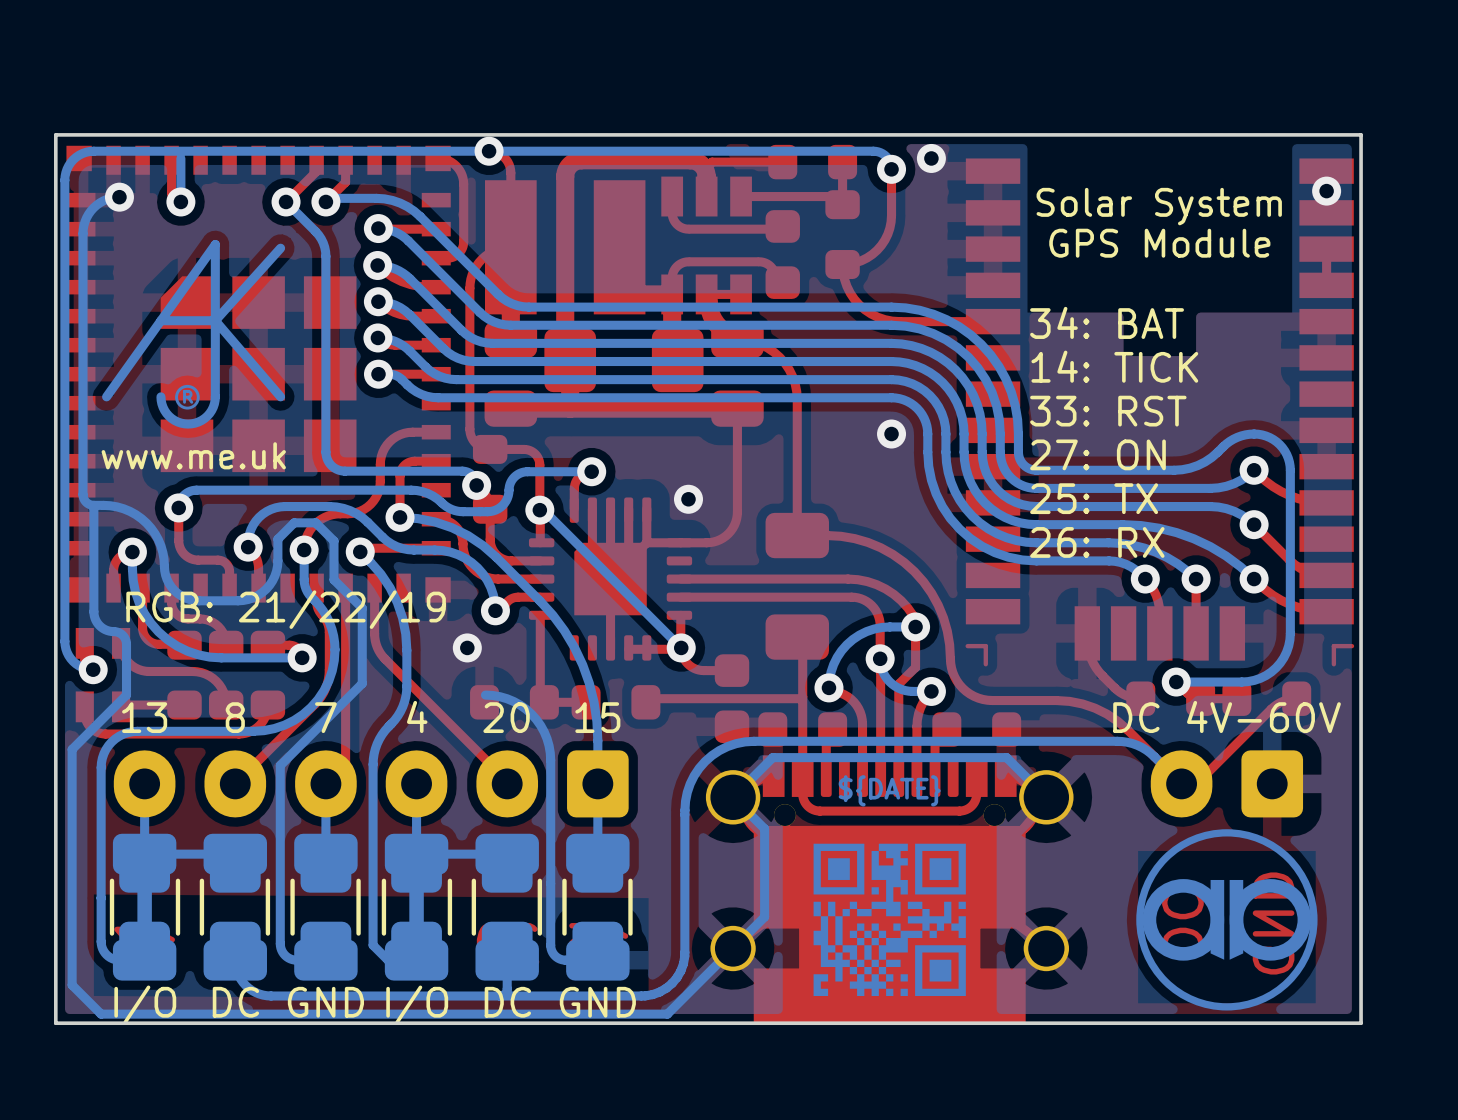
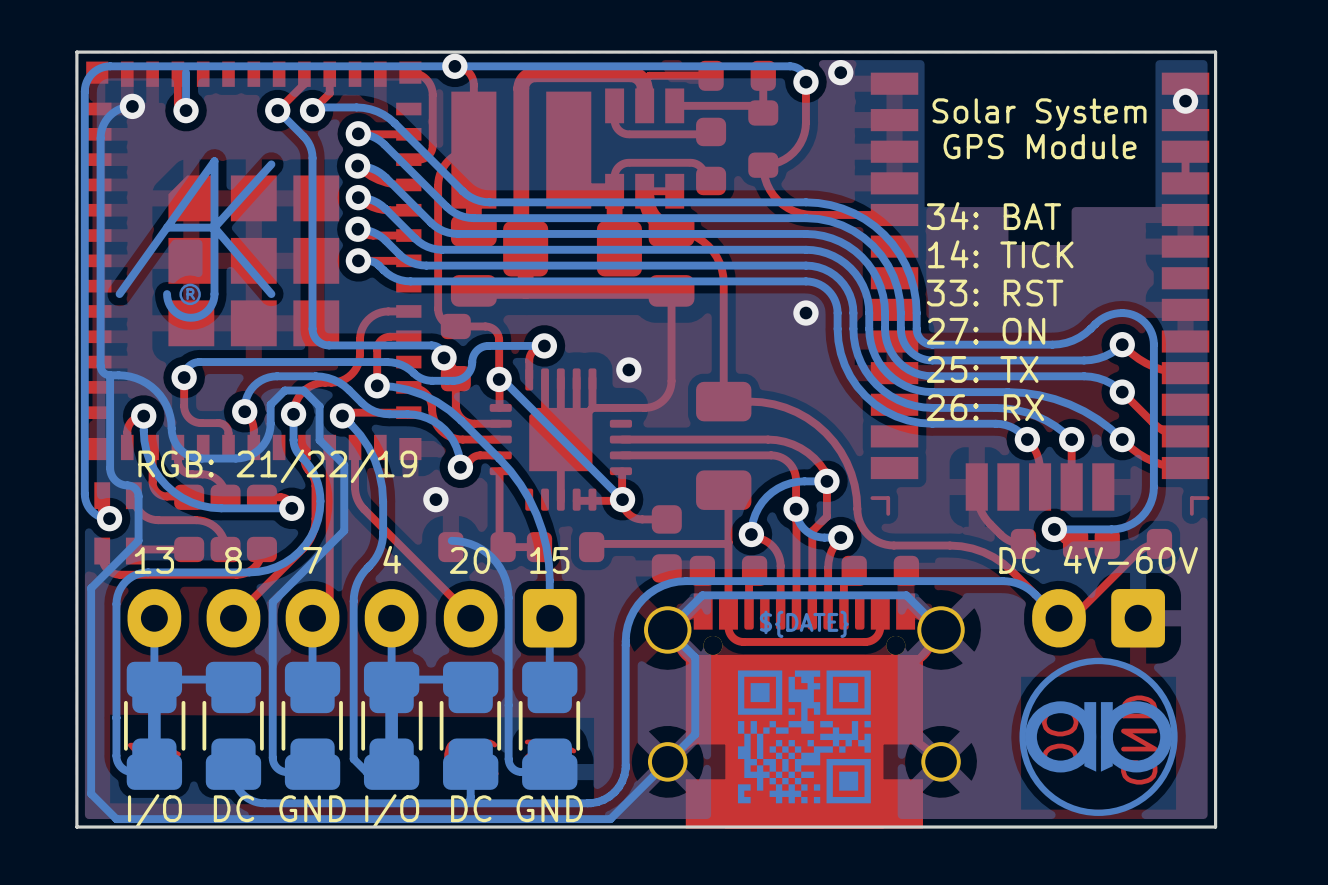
drawing shape: [101, 240, 286, 470] -> [115, 157, 276, 322]

